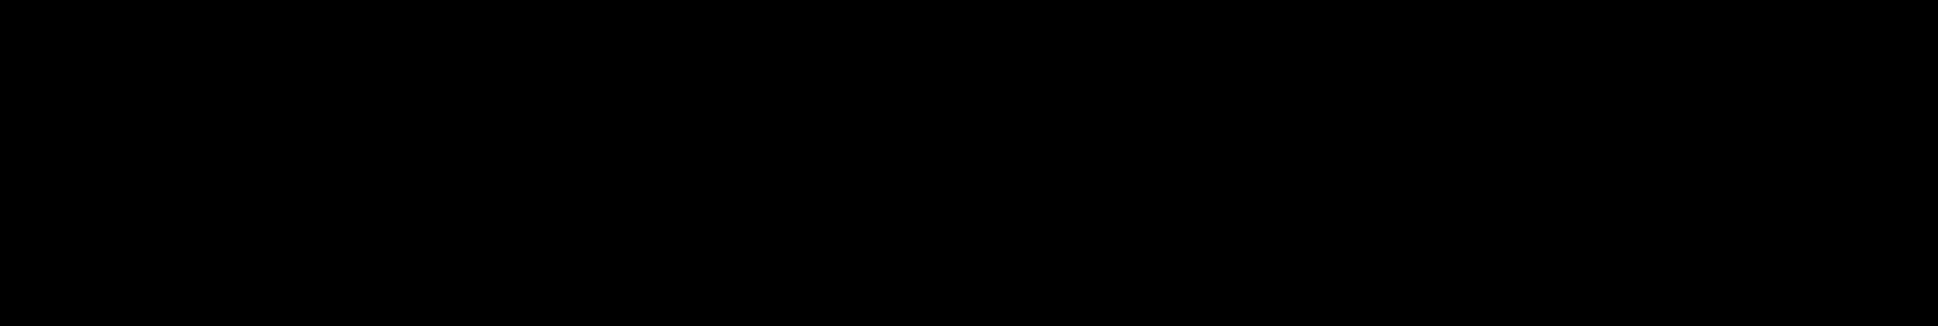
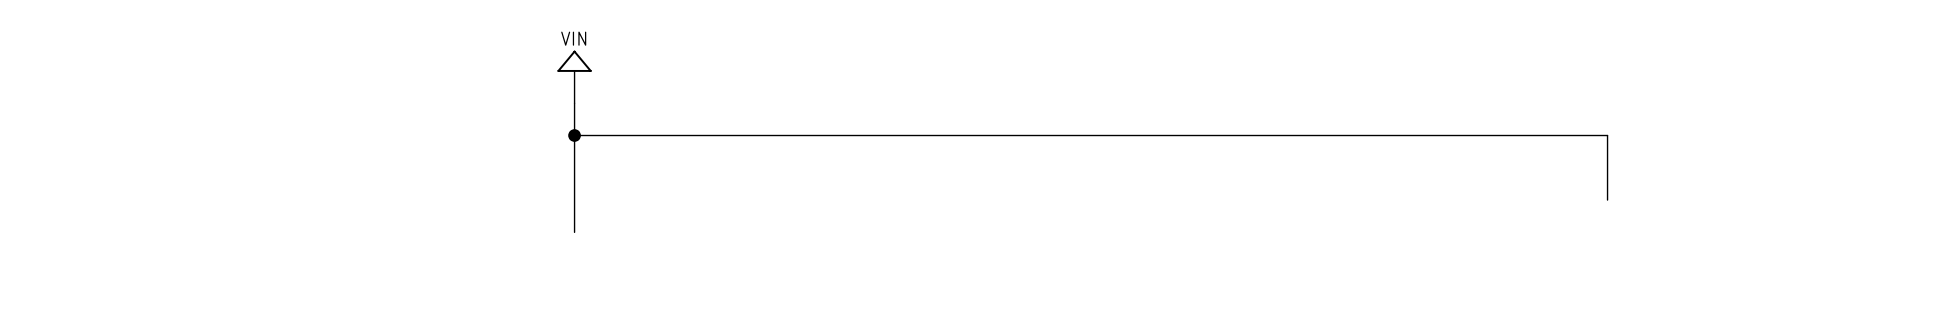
power symbol: none -> VIN (574, 76)
wire: none -> (574, 103) (574, 232)
wire: none -> (574, 135) (1607, 135) (1607, 200)
junction: none -> (574, 135)

